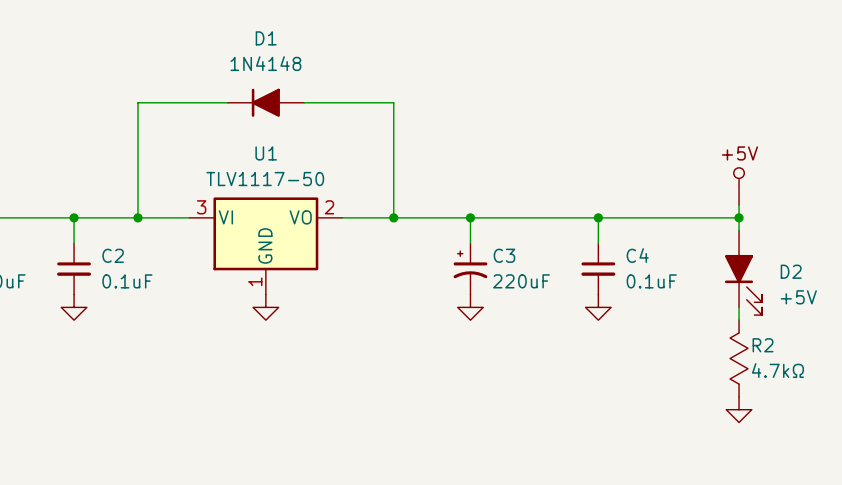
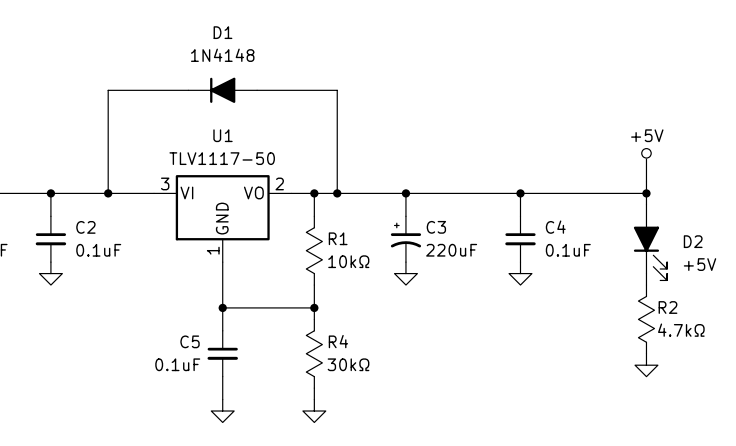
wire: none -> (314, 193) (314, 216)
junction: none -> (314, 193)
R1: none -> 10kΩ (314, 250)
wire: none -> (222, 262) (222, 330)
power symbol: (265, 307) -> none
wire: none -> (314, 285) (314, 319)
wire: none -> (222, 307) (314, 307)
junction: none -> (222, 307)
junction: none -> (314, 307)
C5: none -> 0.1uF (222, 353)
R4: none -> 30kΩ (314, 353)
wire: none -> (222, 376) (222, 399)
wire: none -> (314, 388) (314, 399)
power symbol: none -> (222, 411)
power symbol: none -> (314, 411)

